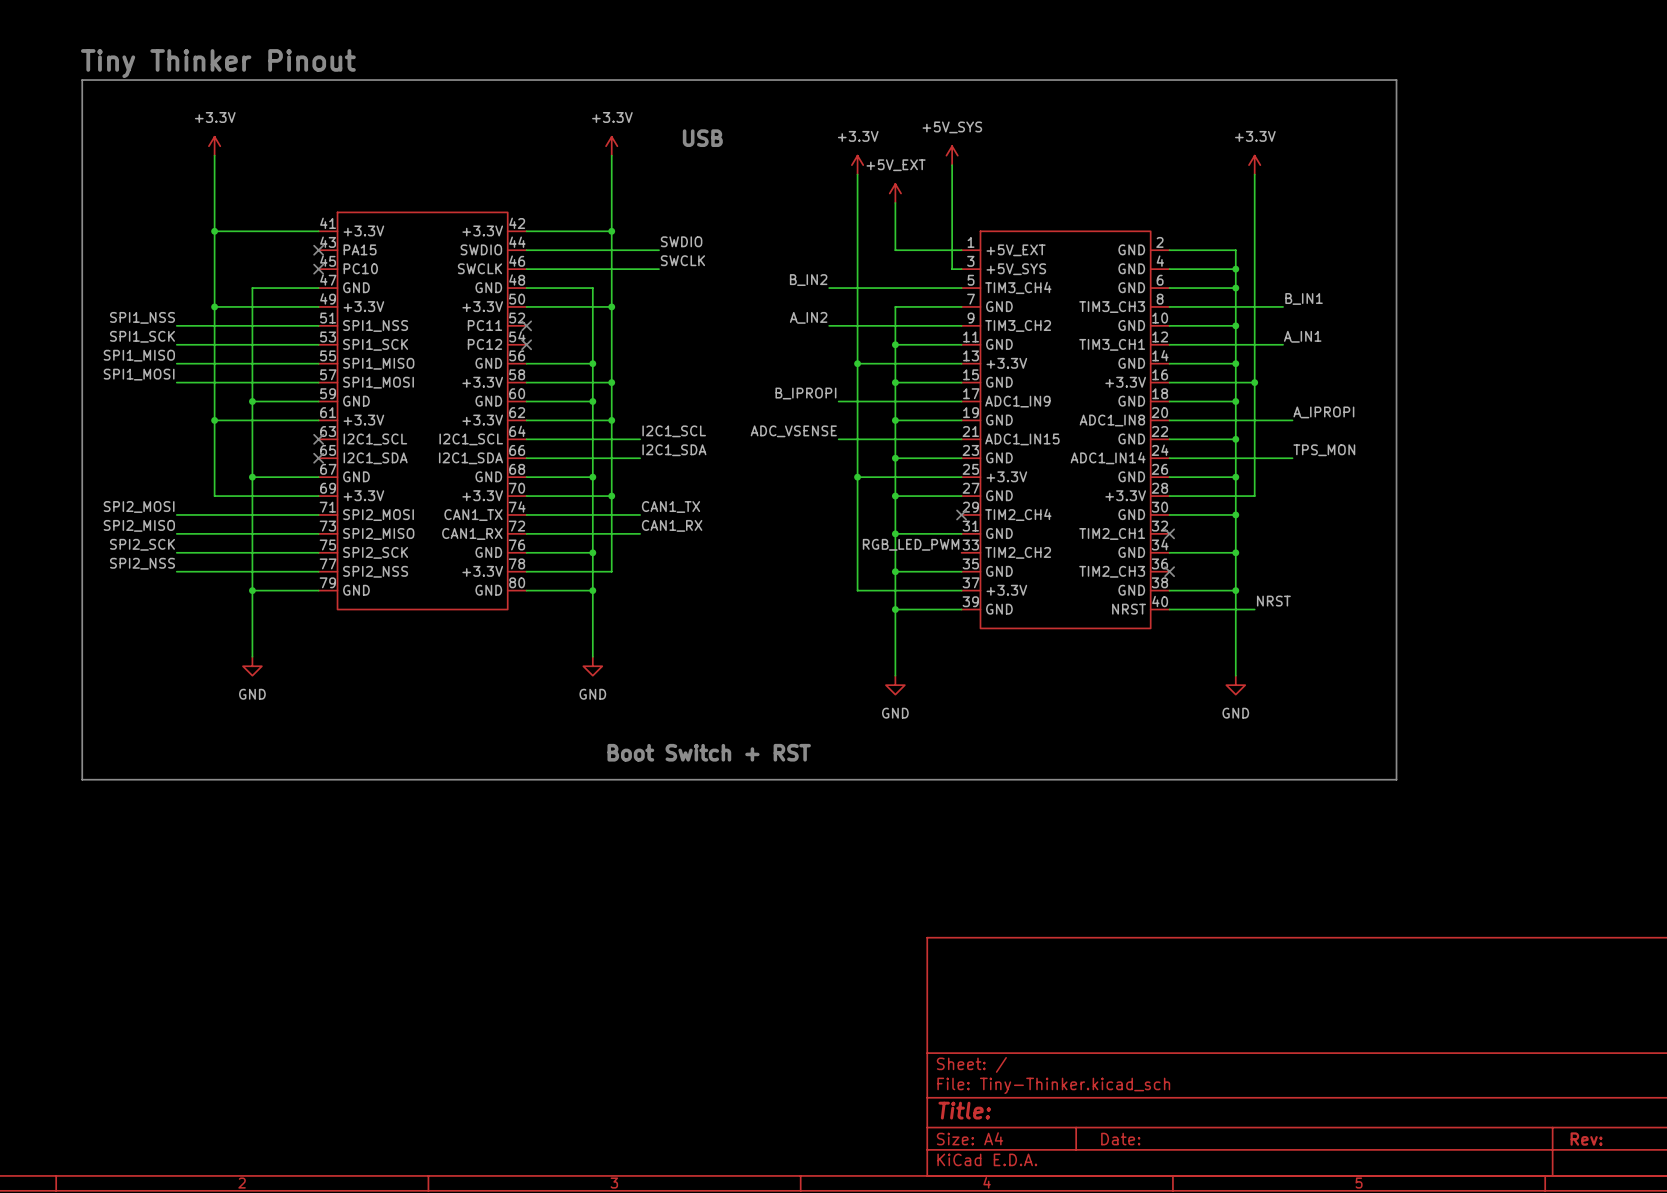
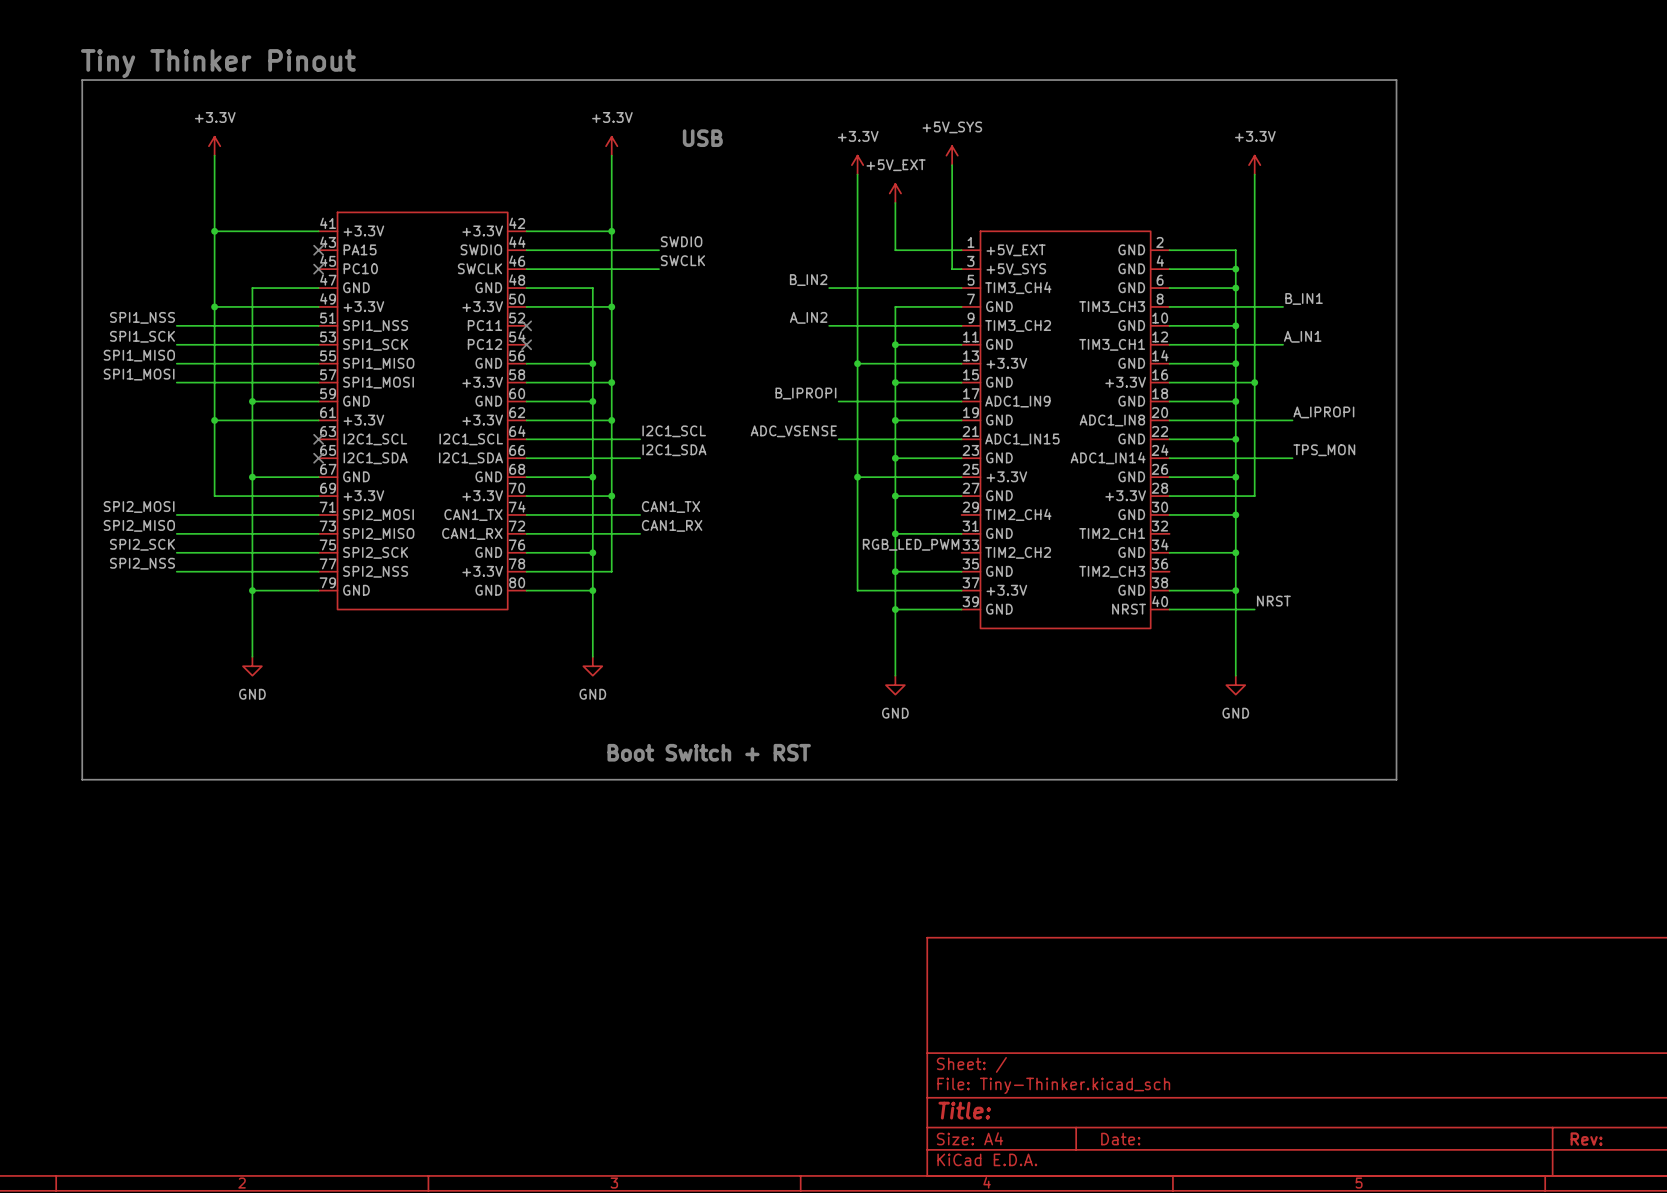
no-connect mark: (961, 514) -> none
no-connect mark: (1169, 533) -> none
no-connect mark: (1169, 571) -> none

